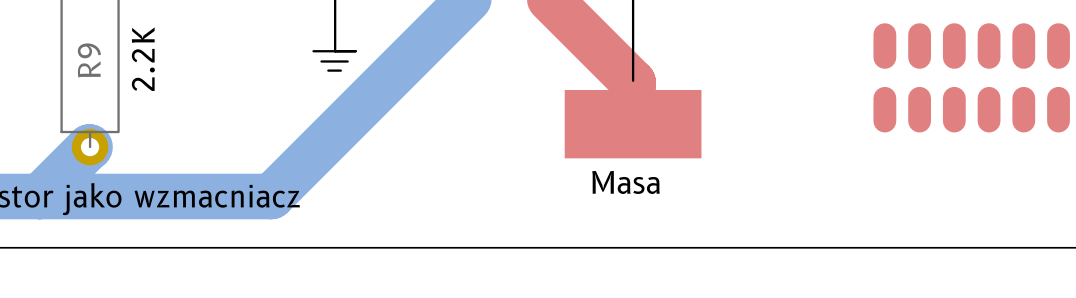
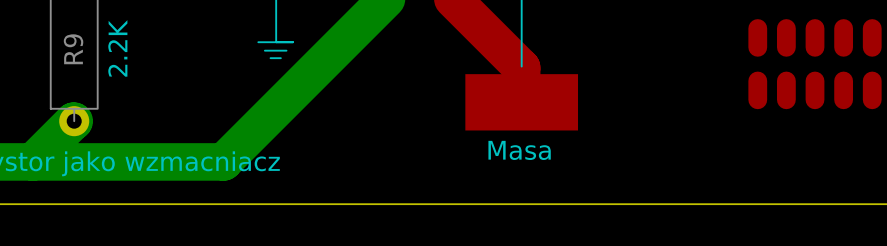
part: (884, 46) -> none
part: (884, 109) -> none

